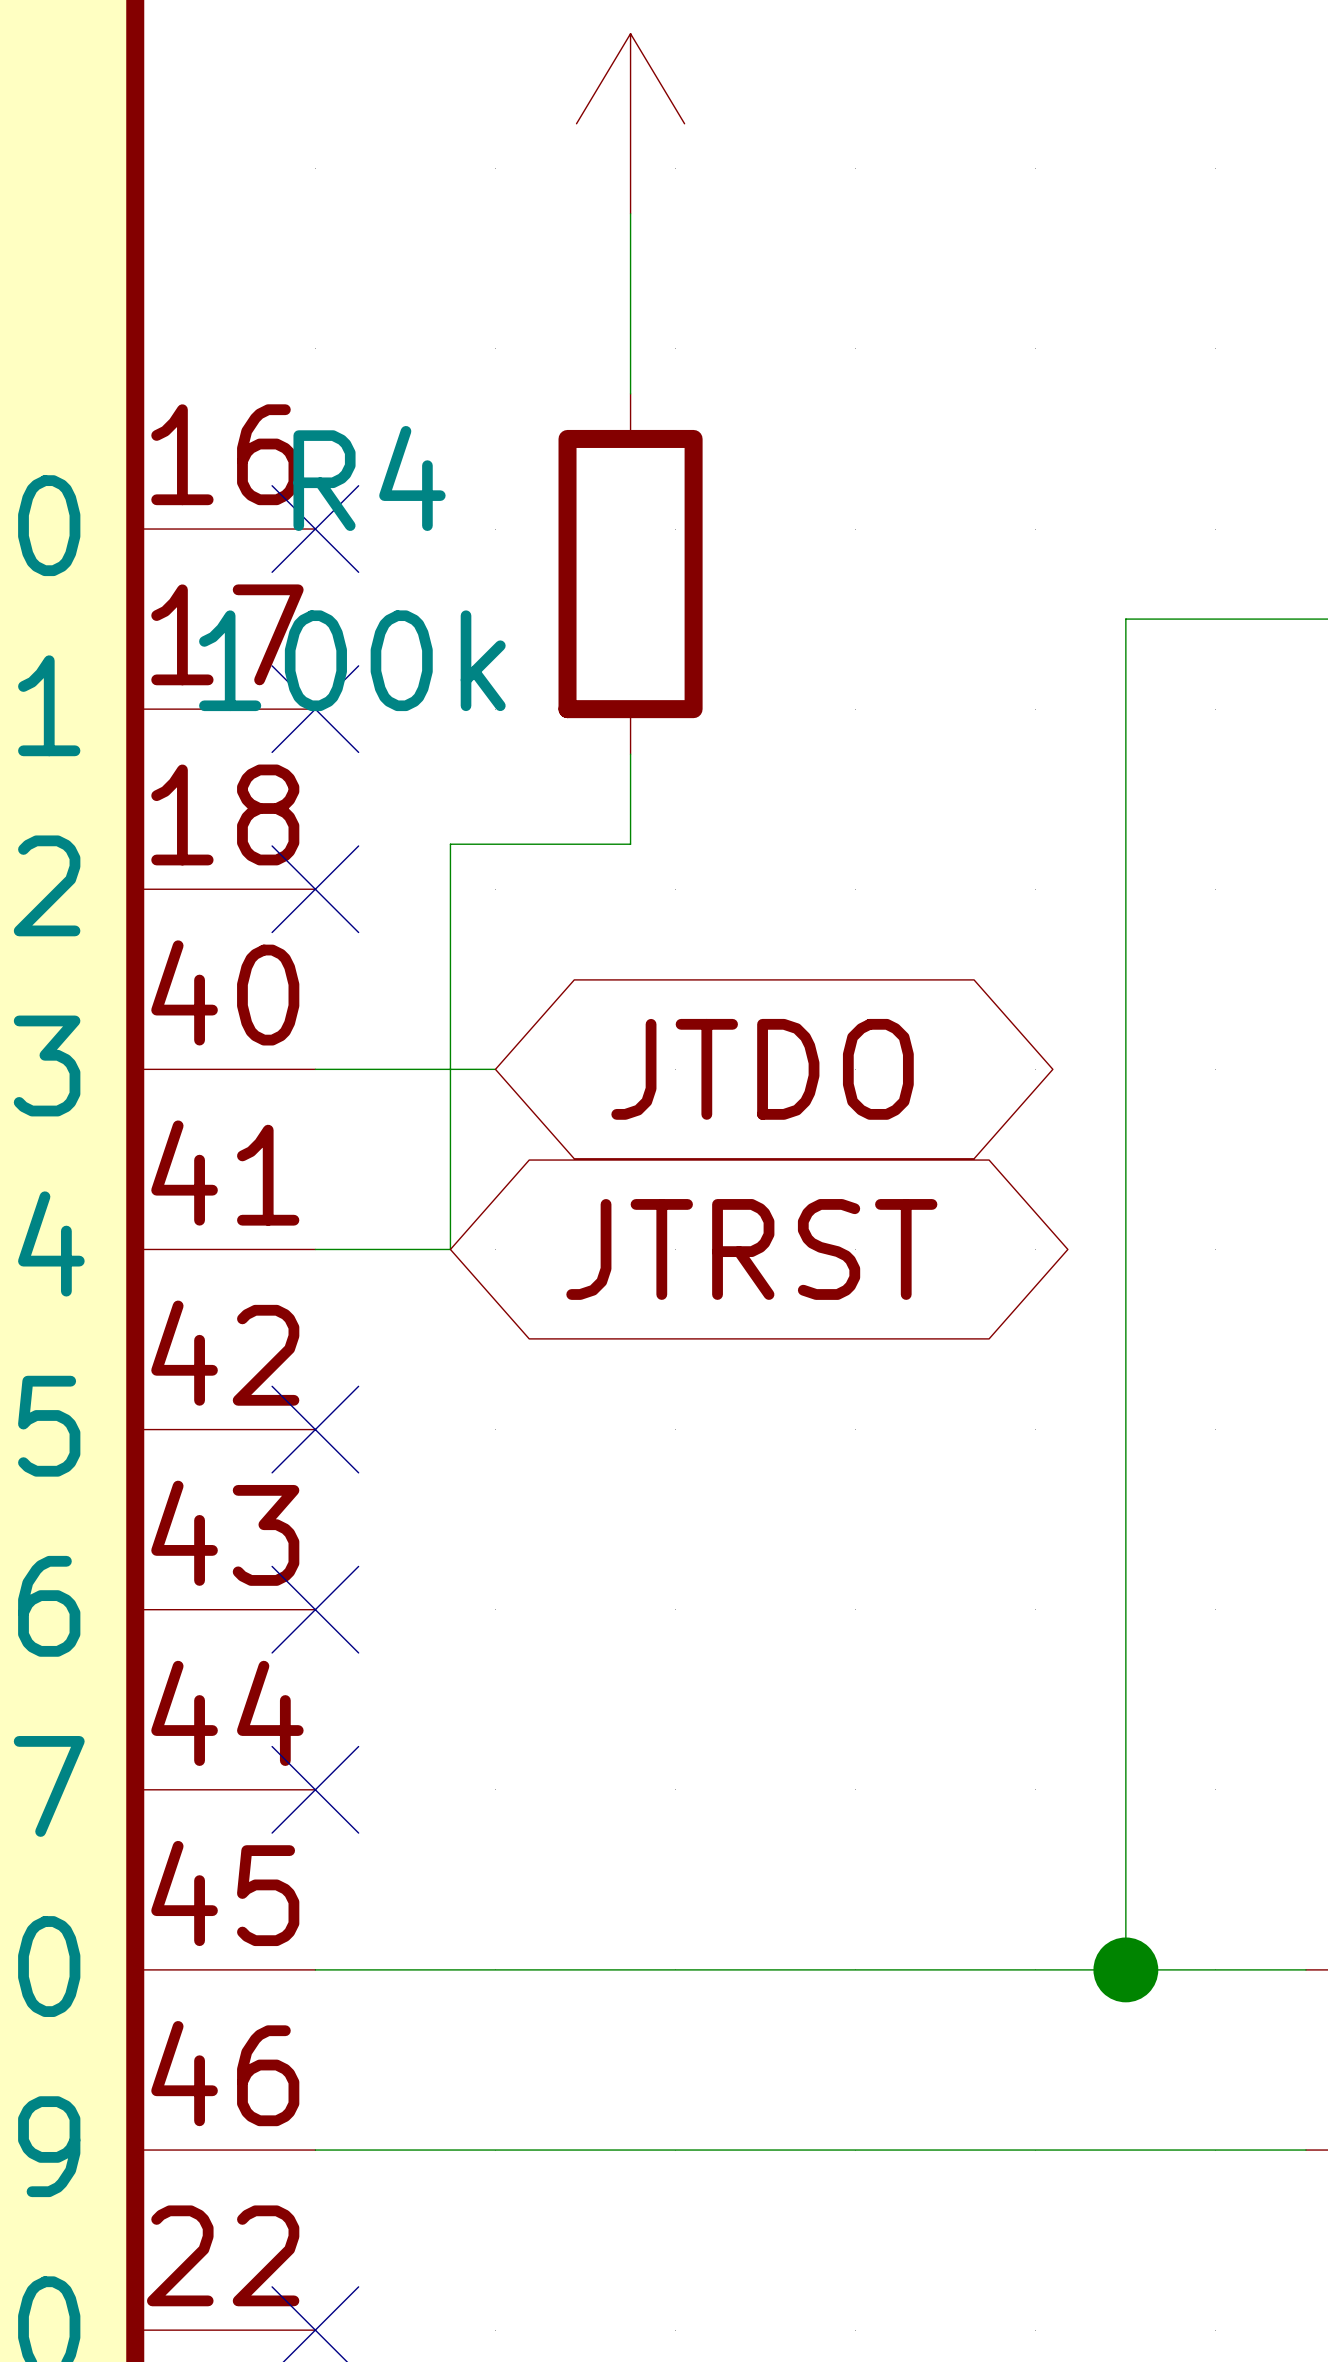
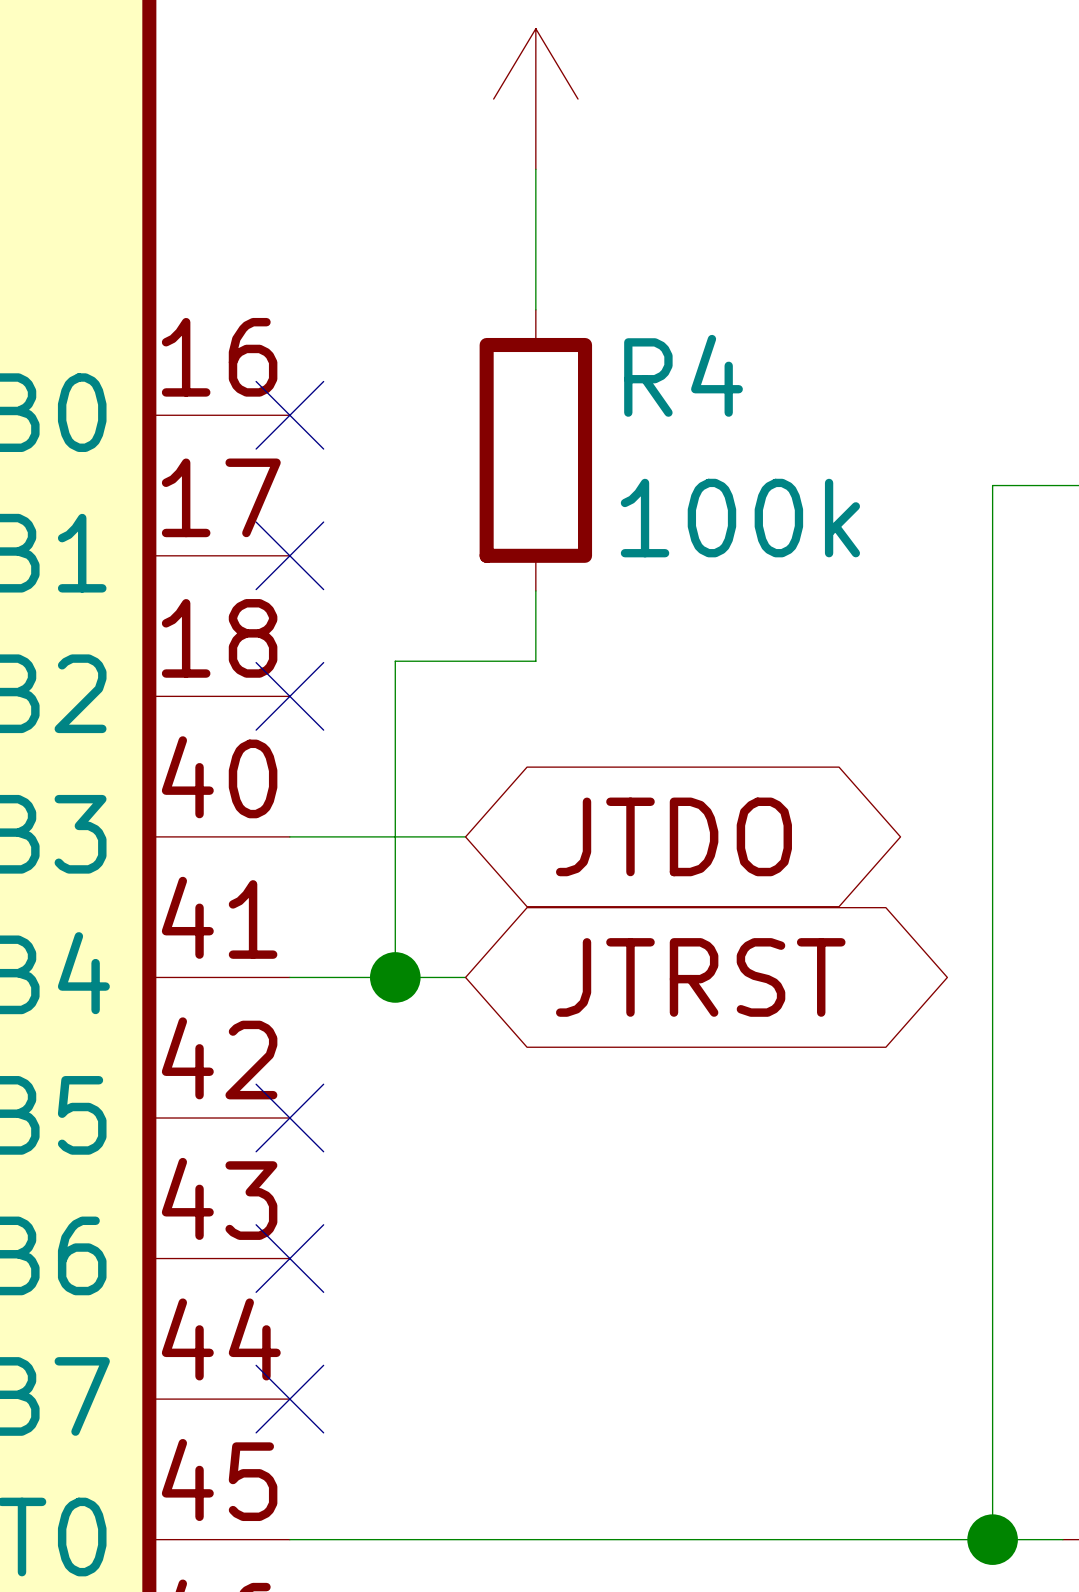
R4 name position: R4 (369, 478) -> R4 (683, 375)
wire: (1215, 619) (1125, 619) (1125, 1969) -> (992, 485) (992, 1539)
R4 text position: 100k (352, 660) -> 100k (740, 518)
wire: none -> (430, 836) (465, 836)
global label position: JTDO (762, 1069) -> JTDO (673, 836)
wire: none -> (395, 977) (465, 977)
junction: none -> (395, 977)
global label position: JTRST (751, 1249) -> JTRST (700, 977)
junction position: (1125, 1969) -> (992, 1539)

